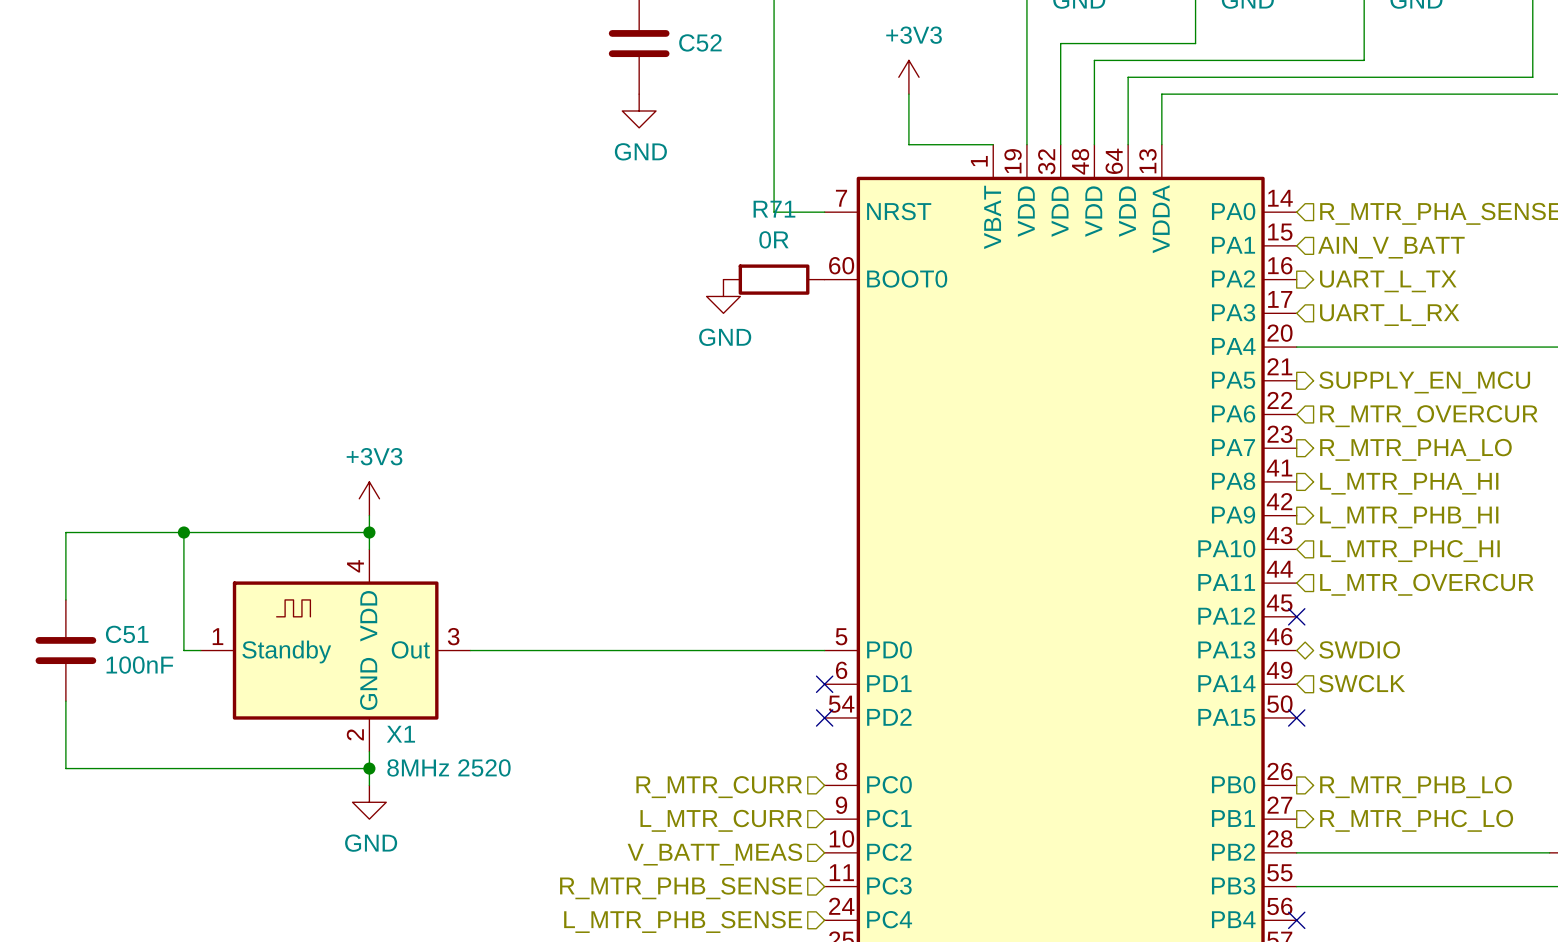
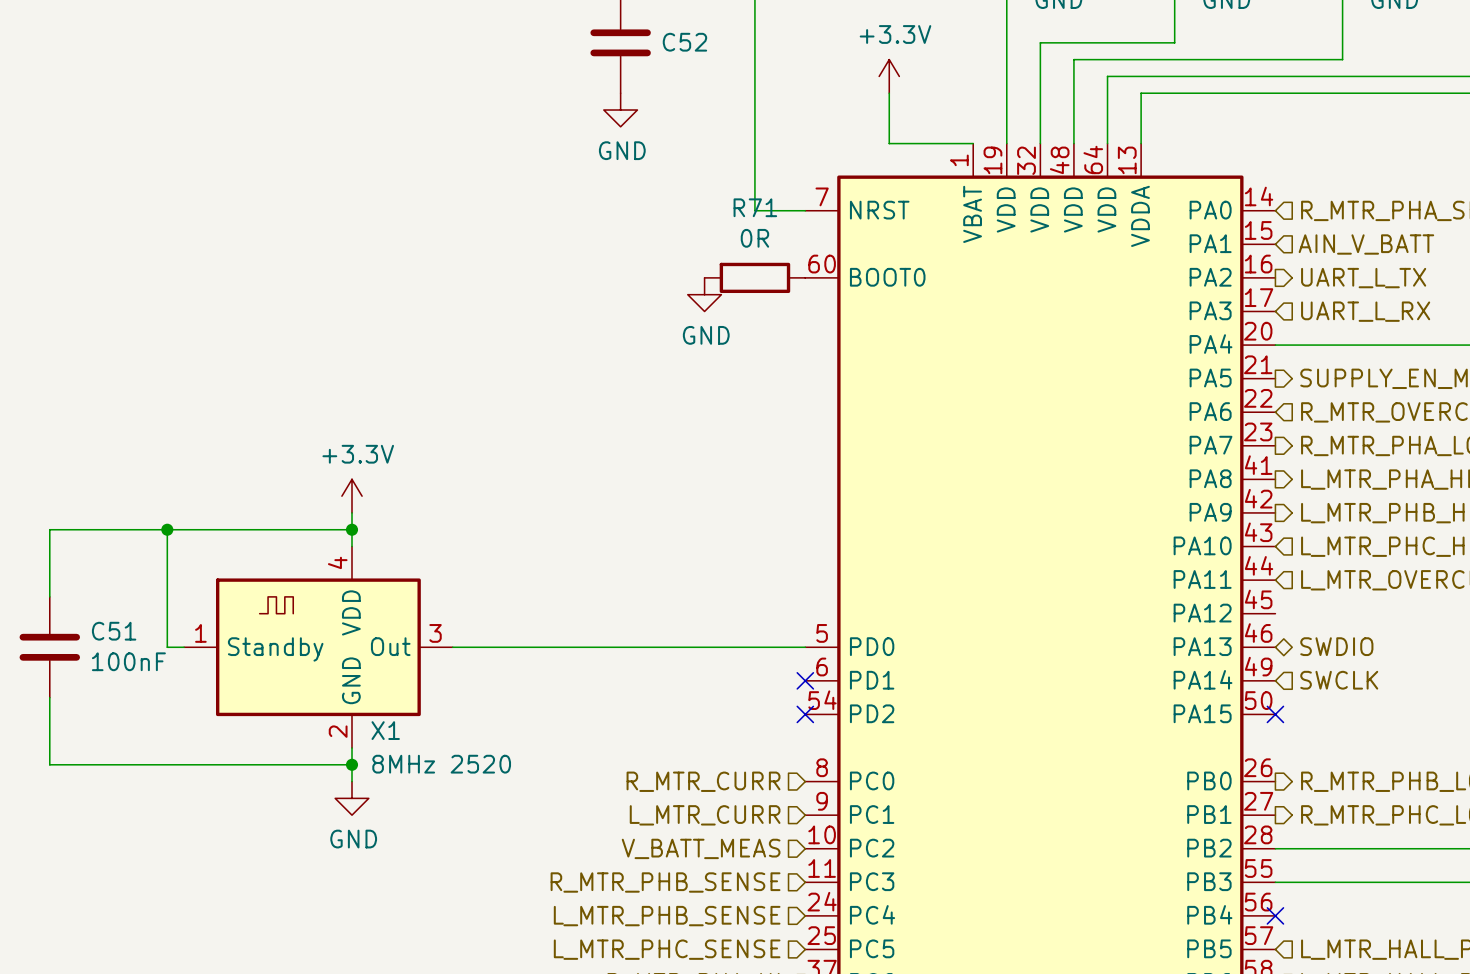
power symbol: +3V3 (908, 77) -> +3.3V (889, 76)
power symbol: +3V3 (369, 498) -> +3.3V (351, 496)
no-connect mark: (1296, 616) -> none

